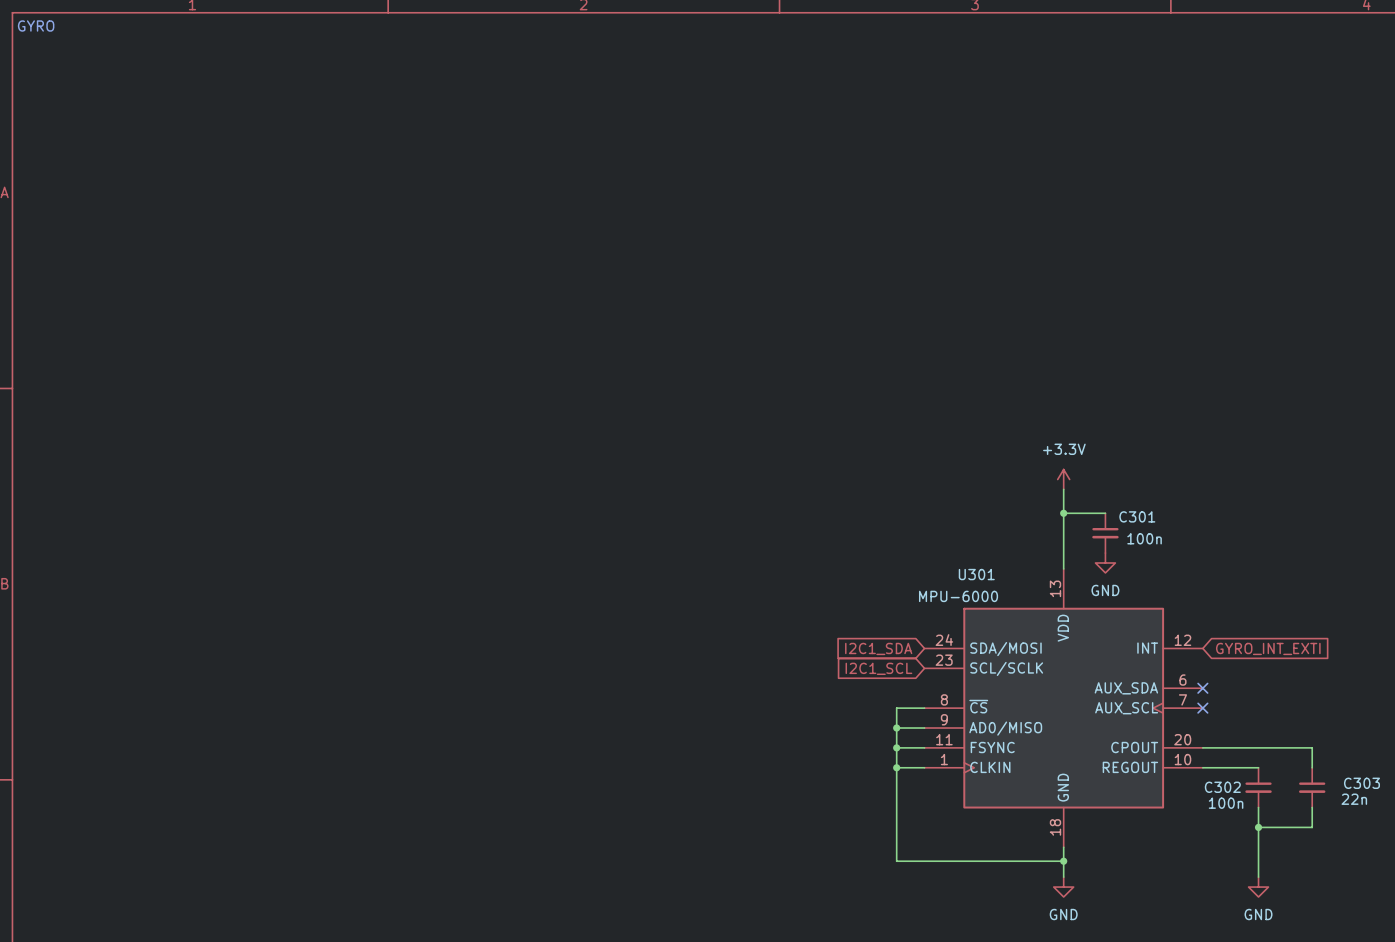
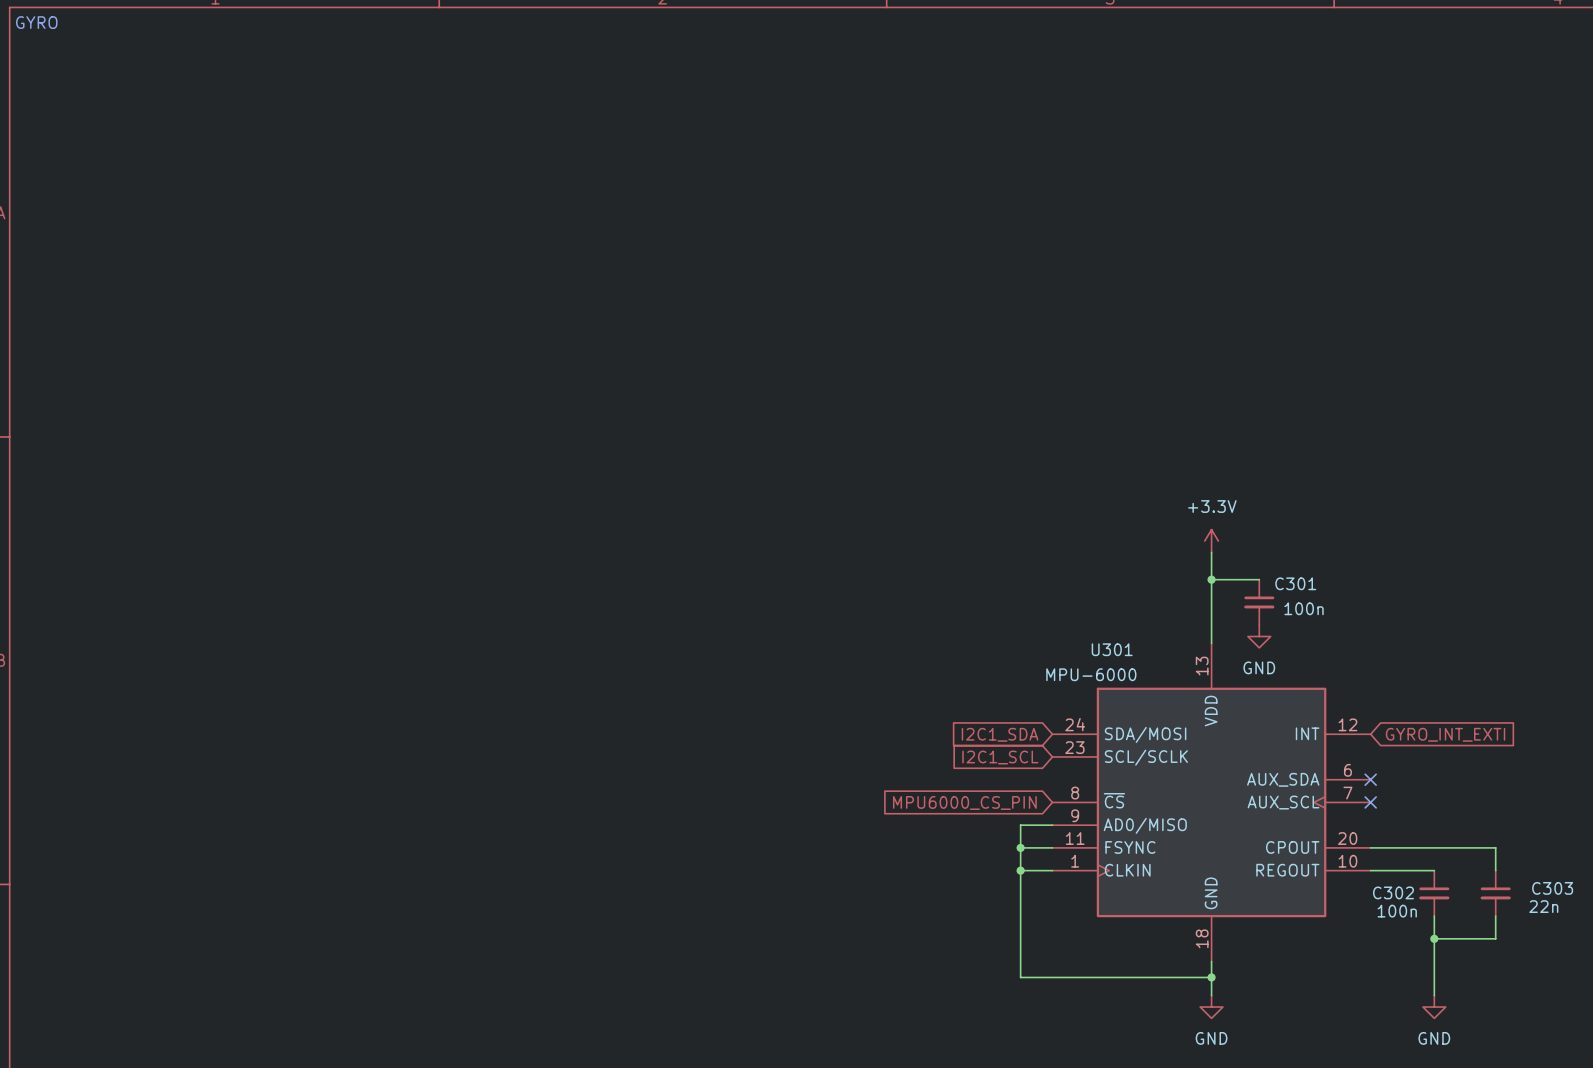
global label: none -> MPU6000_CS_PIN (964, 802)
wire: (924, 708) (896, 708) (896, 728) -> none
junction: (896, 728) -> none

